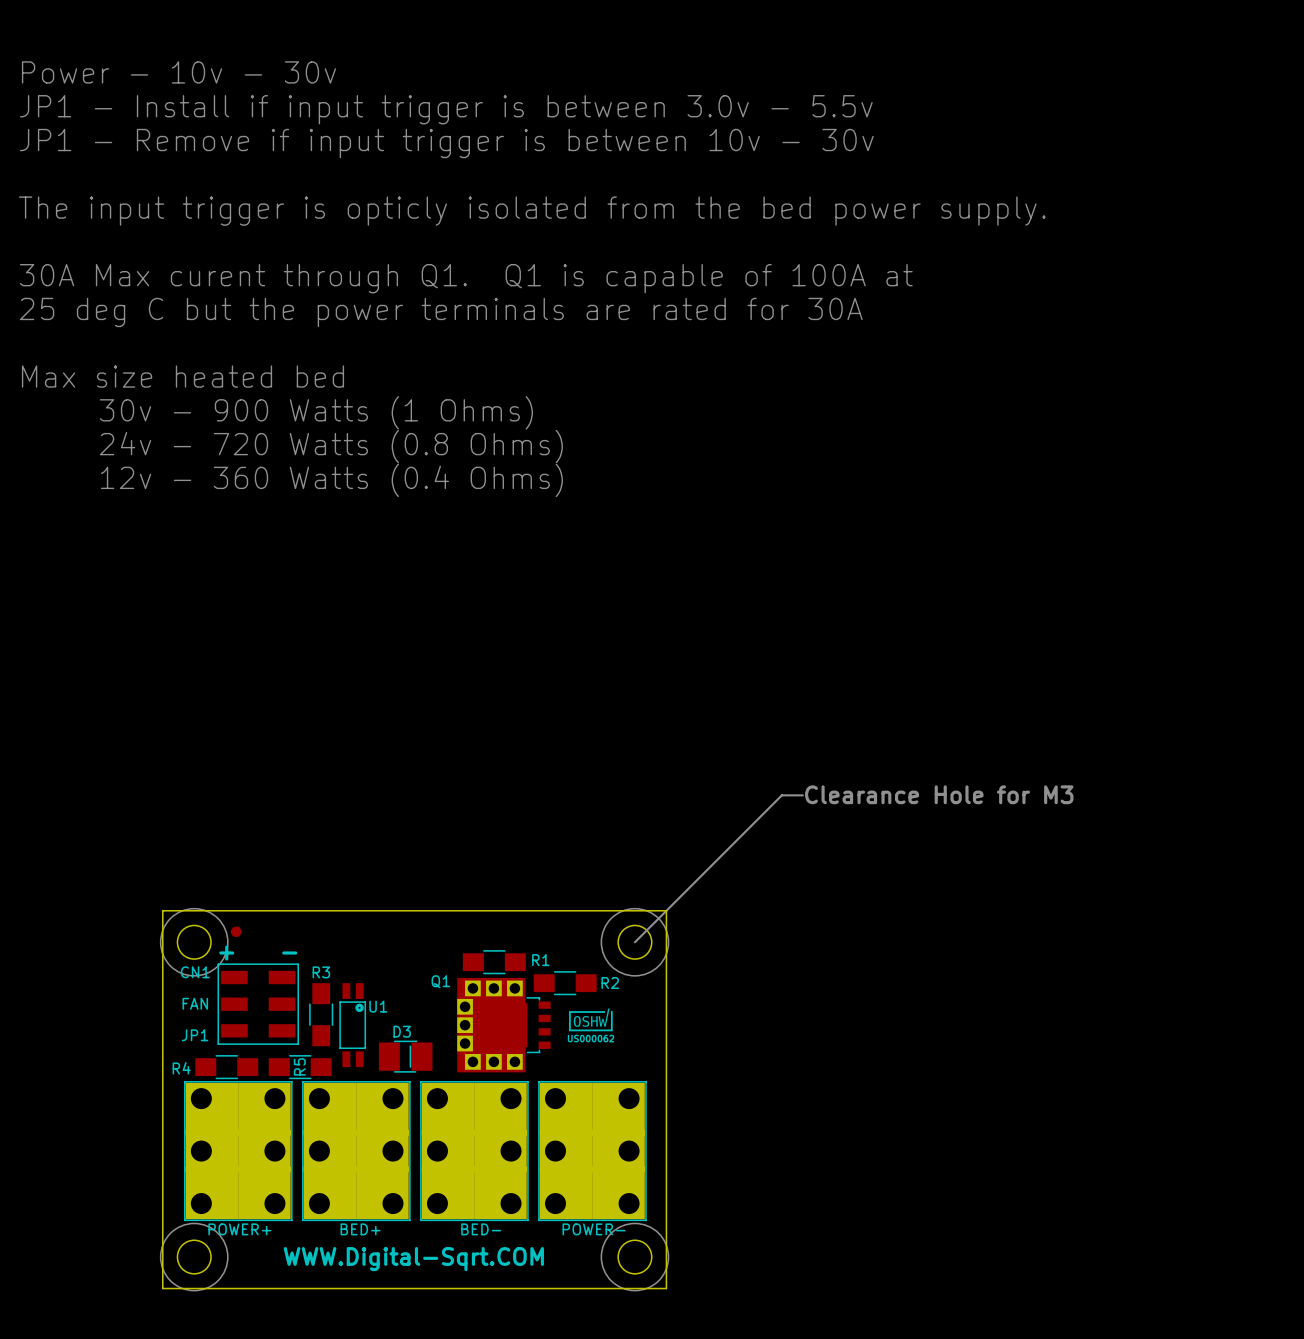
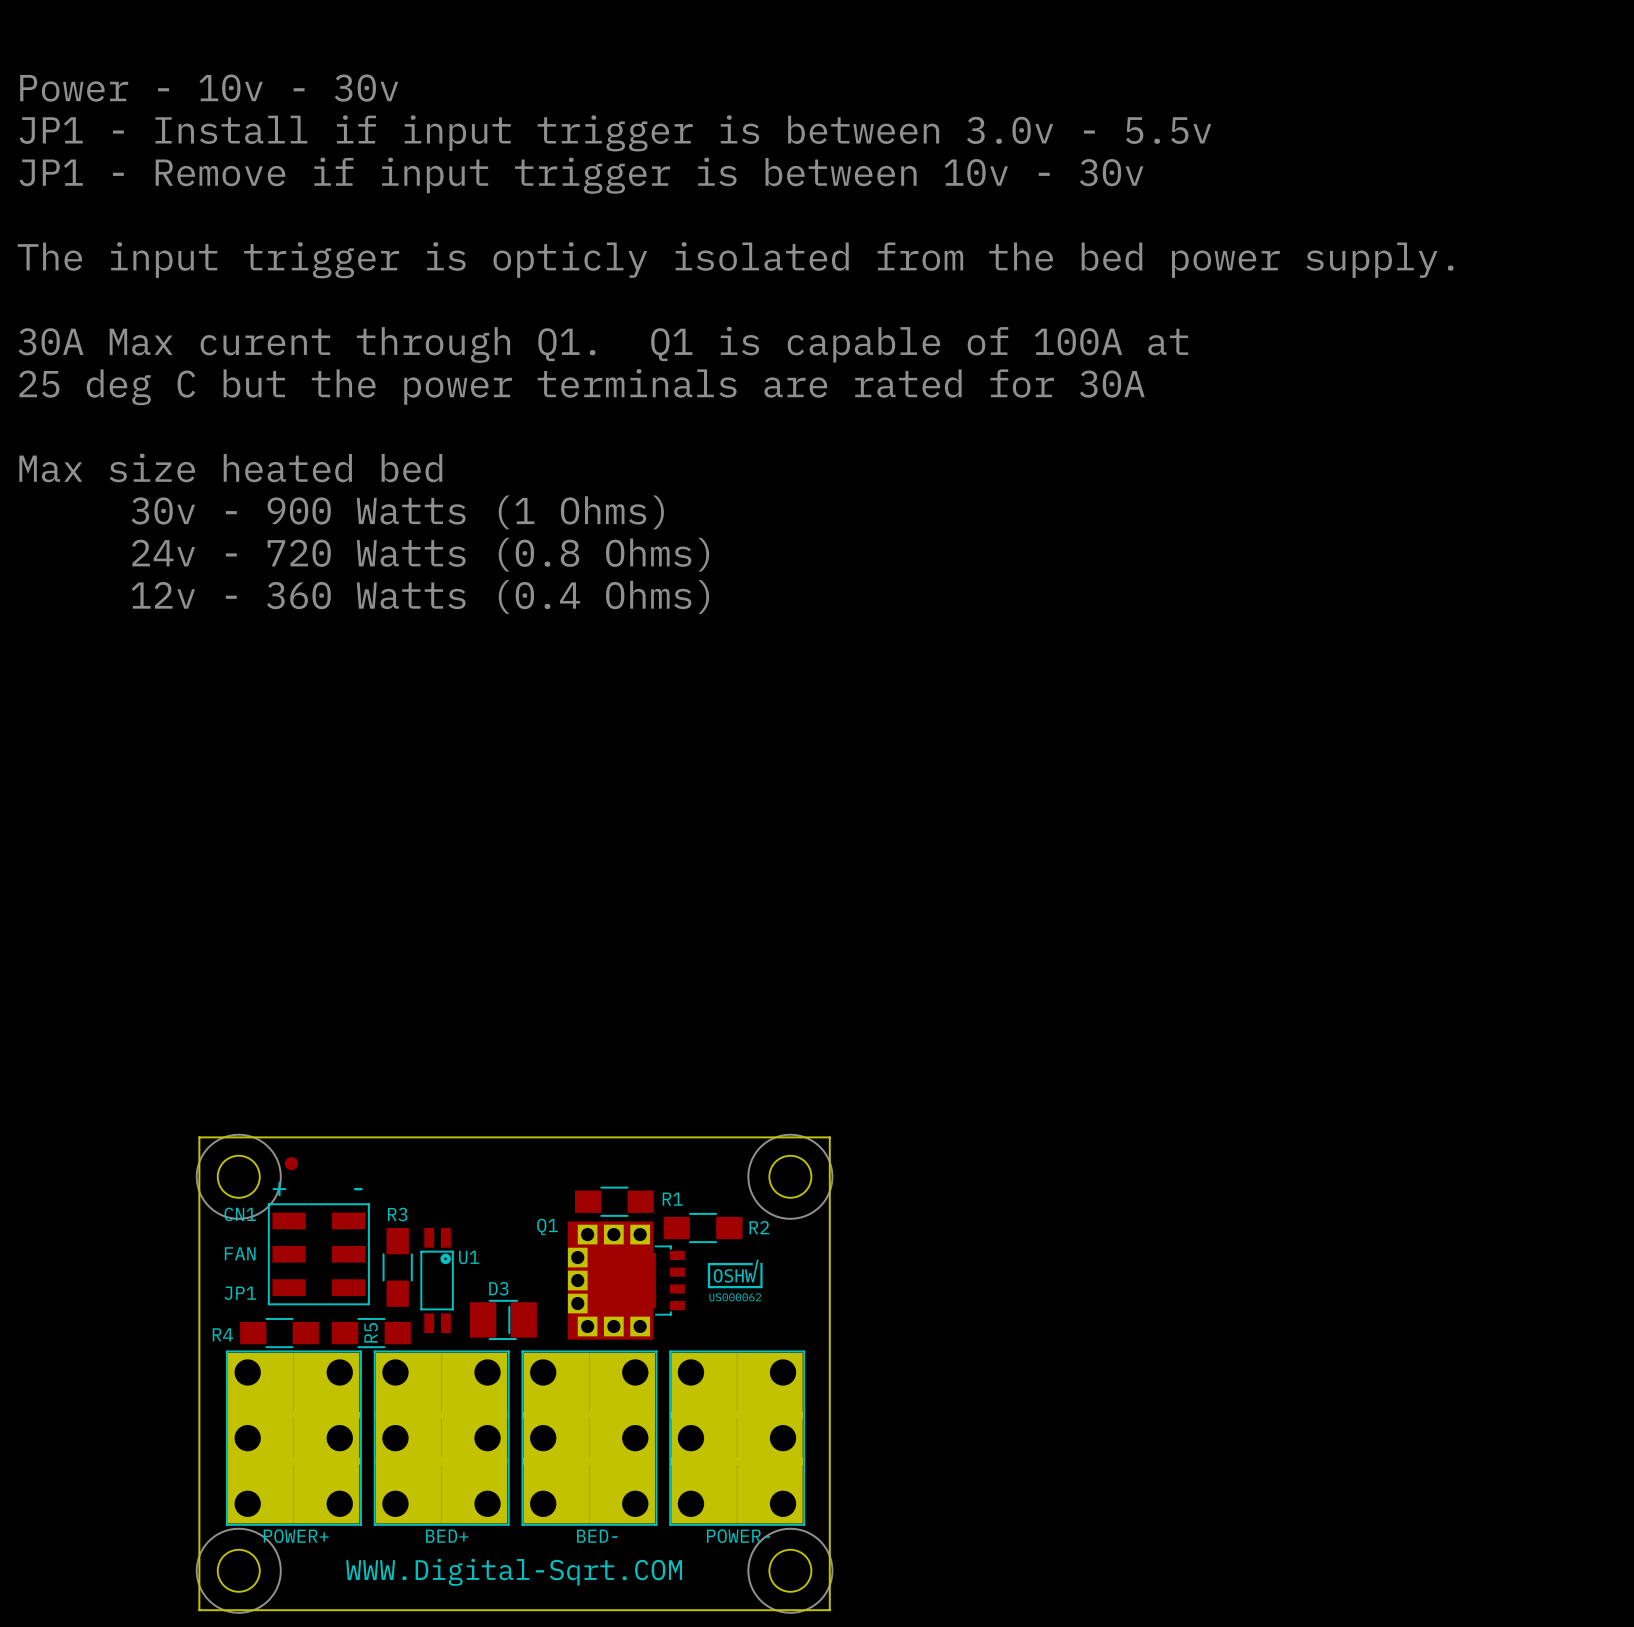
text: Clearance Hole for M3 (939, 794) -> none
line: (802, 795) (781, 795) (634, 942) -> none

